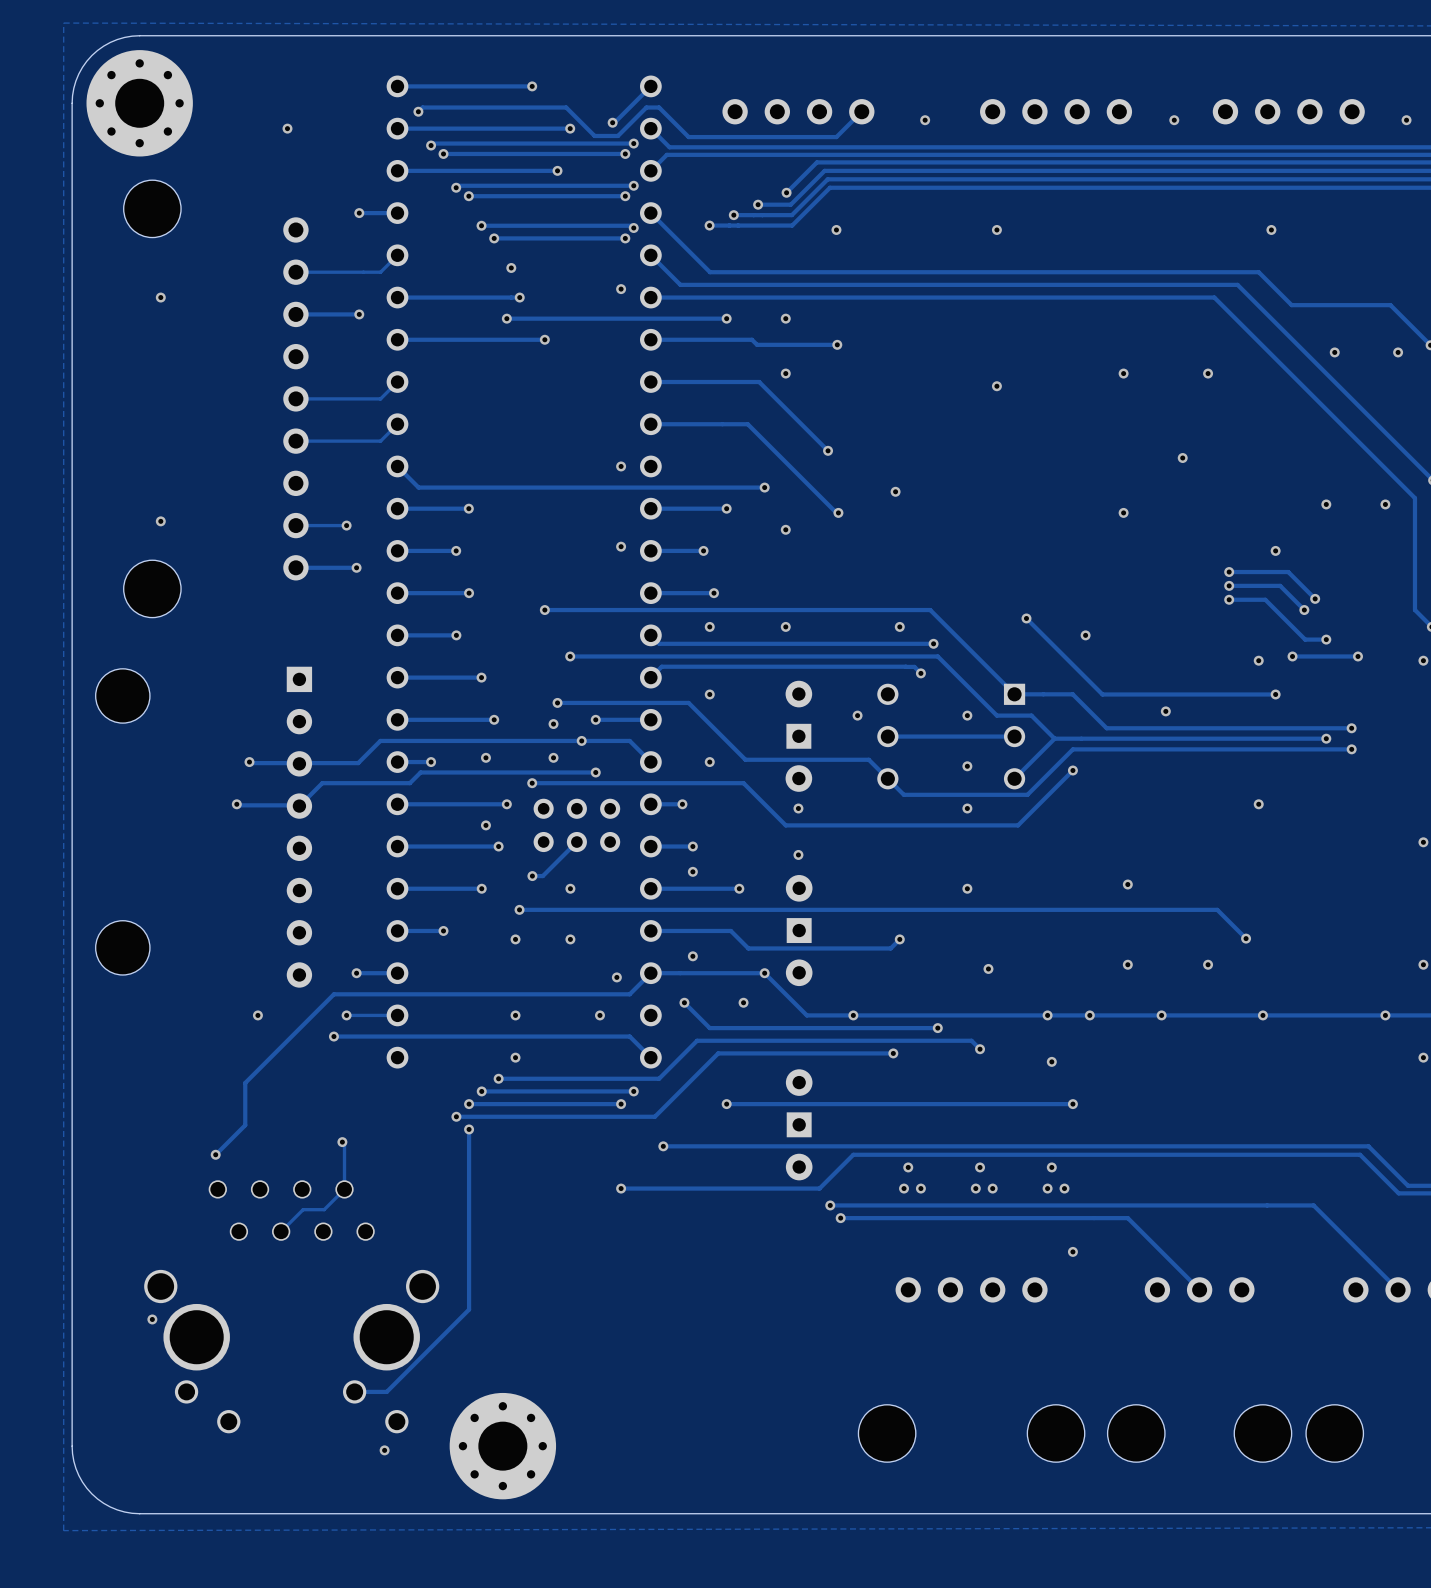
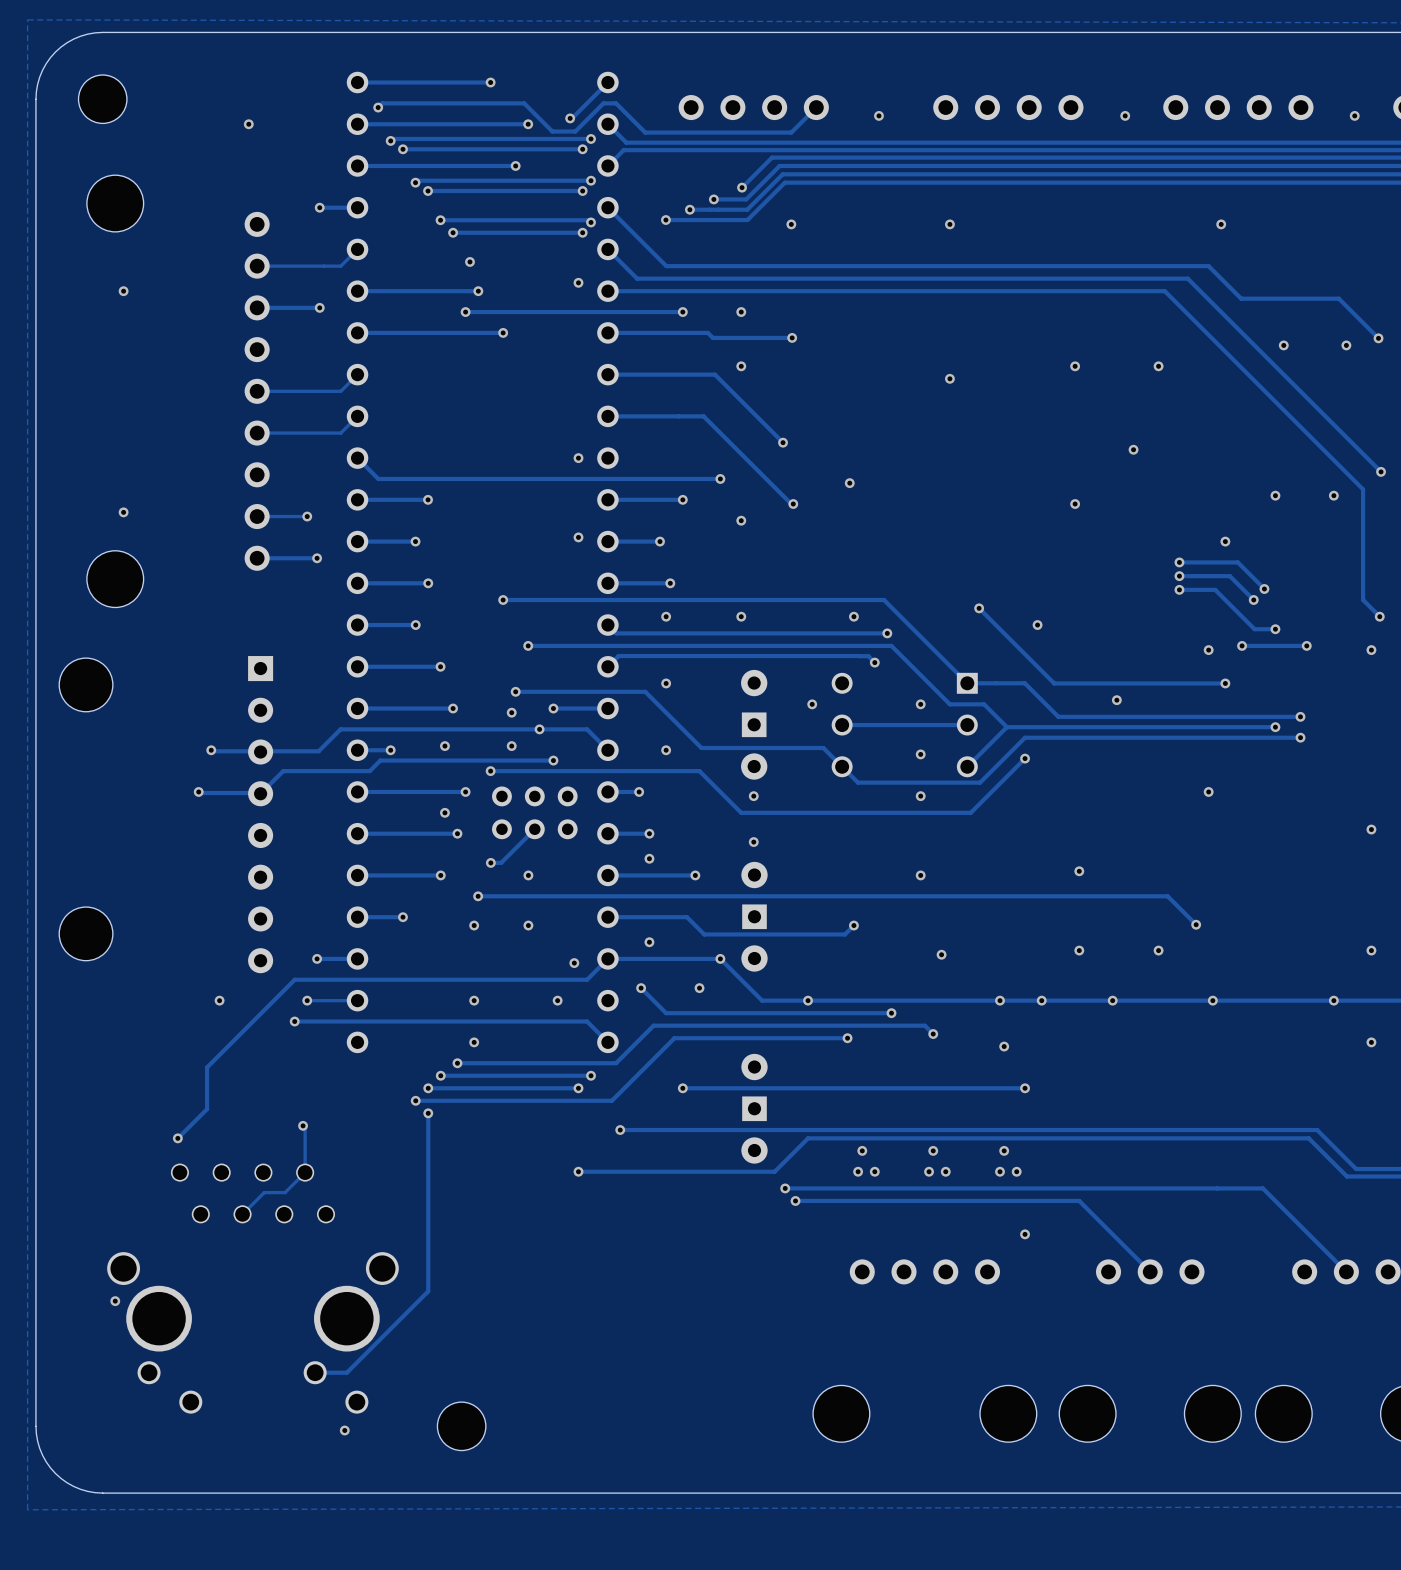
part footprint: [86, 50, 193, 157] -> [78, 74, 127, 124]
part footprint: [449, 1392, 557, 1500] -> [437, 1402, 486, 1451]

